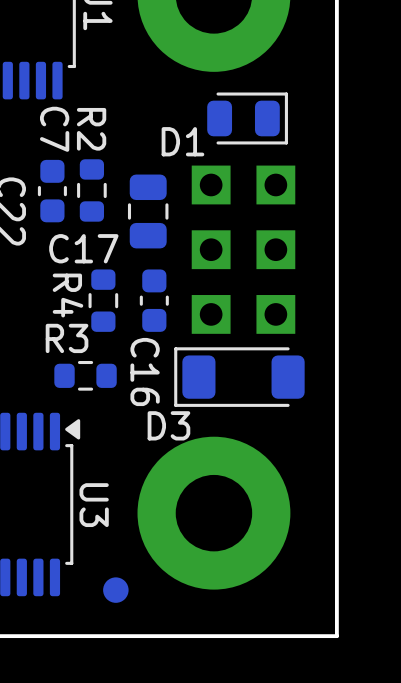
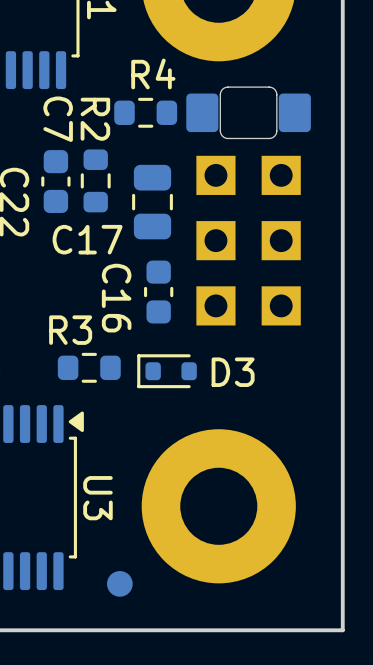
D1: (247, 118) -> none
part: none -> (248, 112)
R4 rotation: 0° (103, 300) -> 90° clockwise (145, 112)
R4 position: (103, 300) -> (145, 112)
D3 footprint: [174, 347, 305, 407] -> [137, 354, 197, 389]
C16 name position: C16 (145, 372) -> C16 (116, 298)
D3 name position: D3 (168, 425) -> D3 (233, 372)

